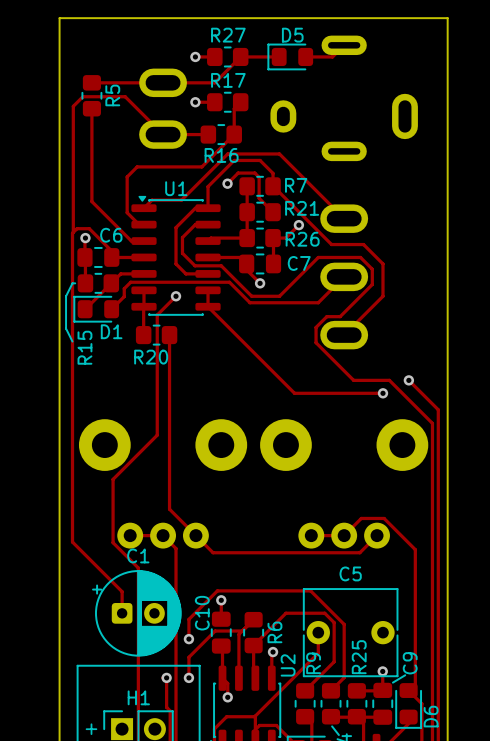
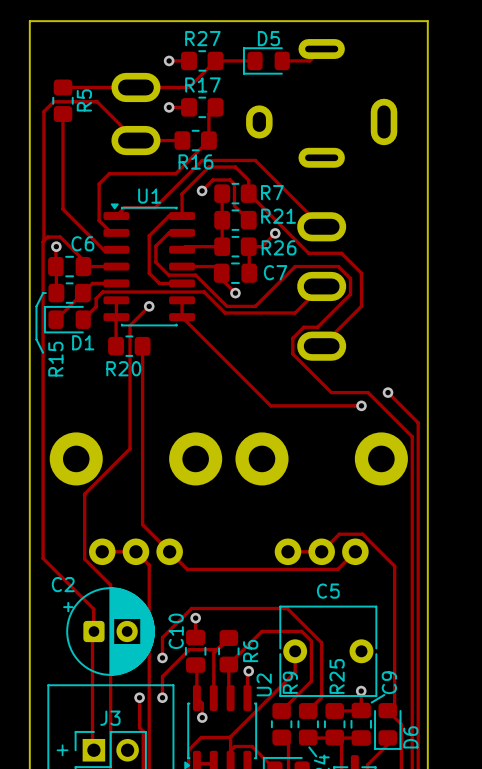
C1 name: C1 (138, 555) -> C2 (63, 584)
track: (121, 591) (122, 613) -> (93, 609) (92, 749)
H1 name: H1 (138, 697) -> J3 (110, 718)

